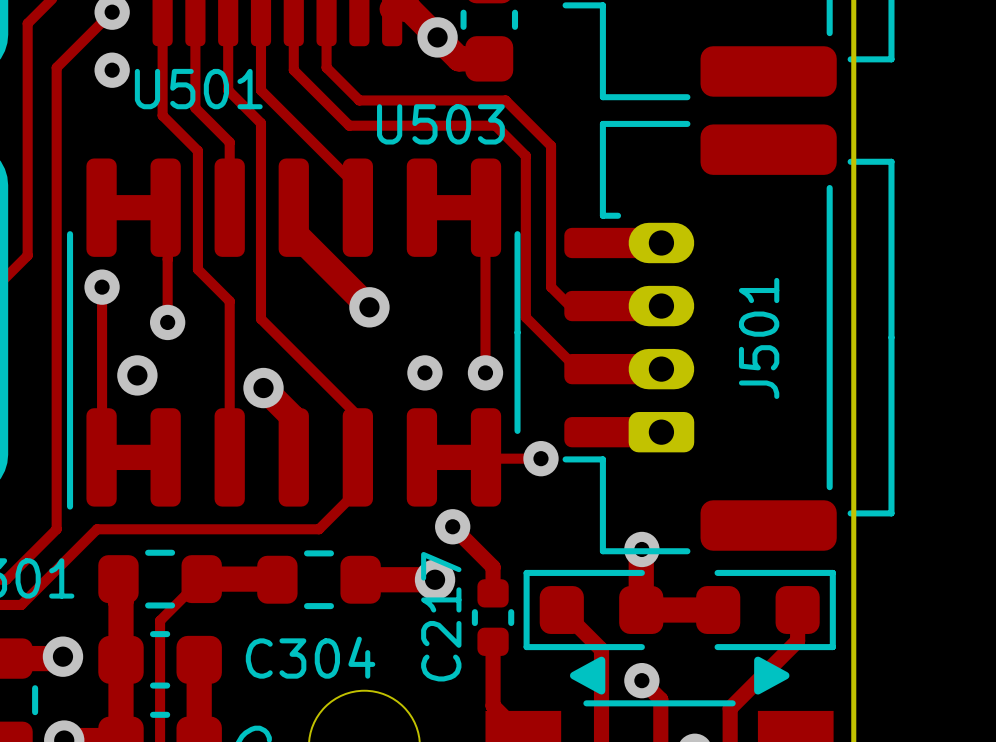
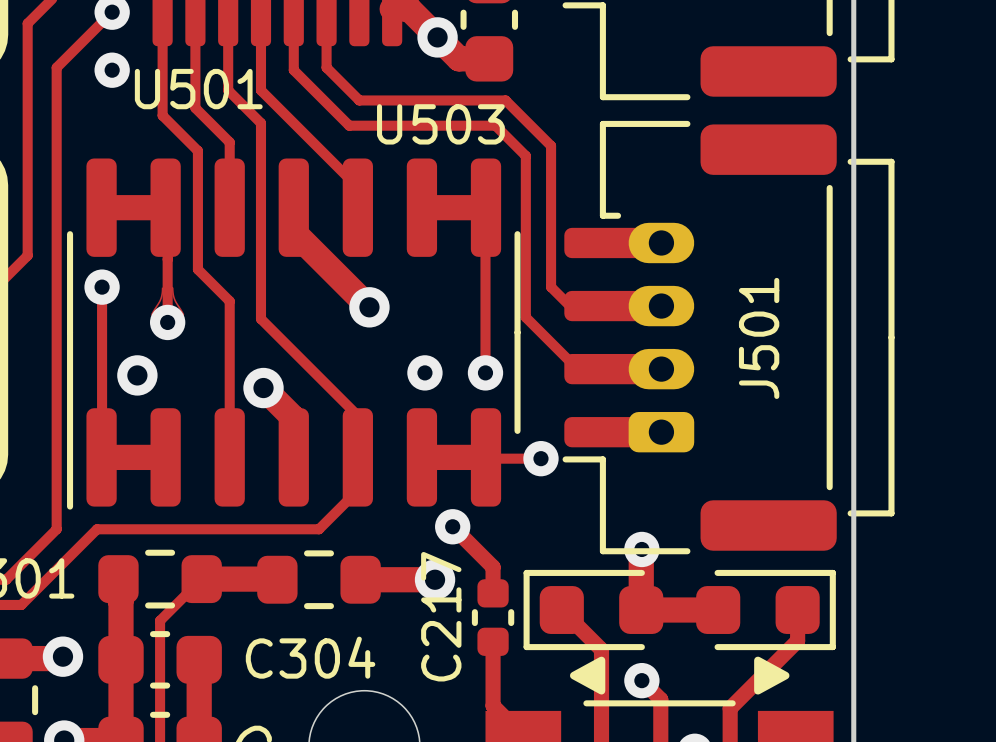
zone outline: none -> (162, 287) (160, 300) (151, 314) (167, 331) (183, 314) (174, 300) (172, 287) (162, 287)

